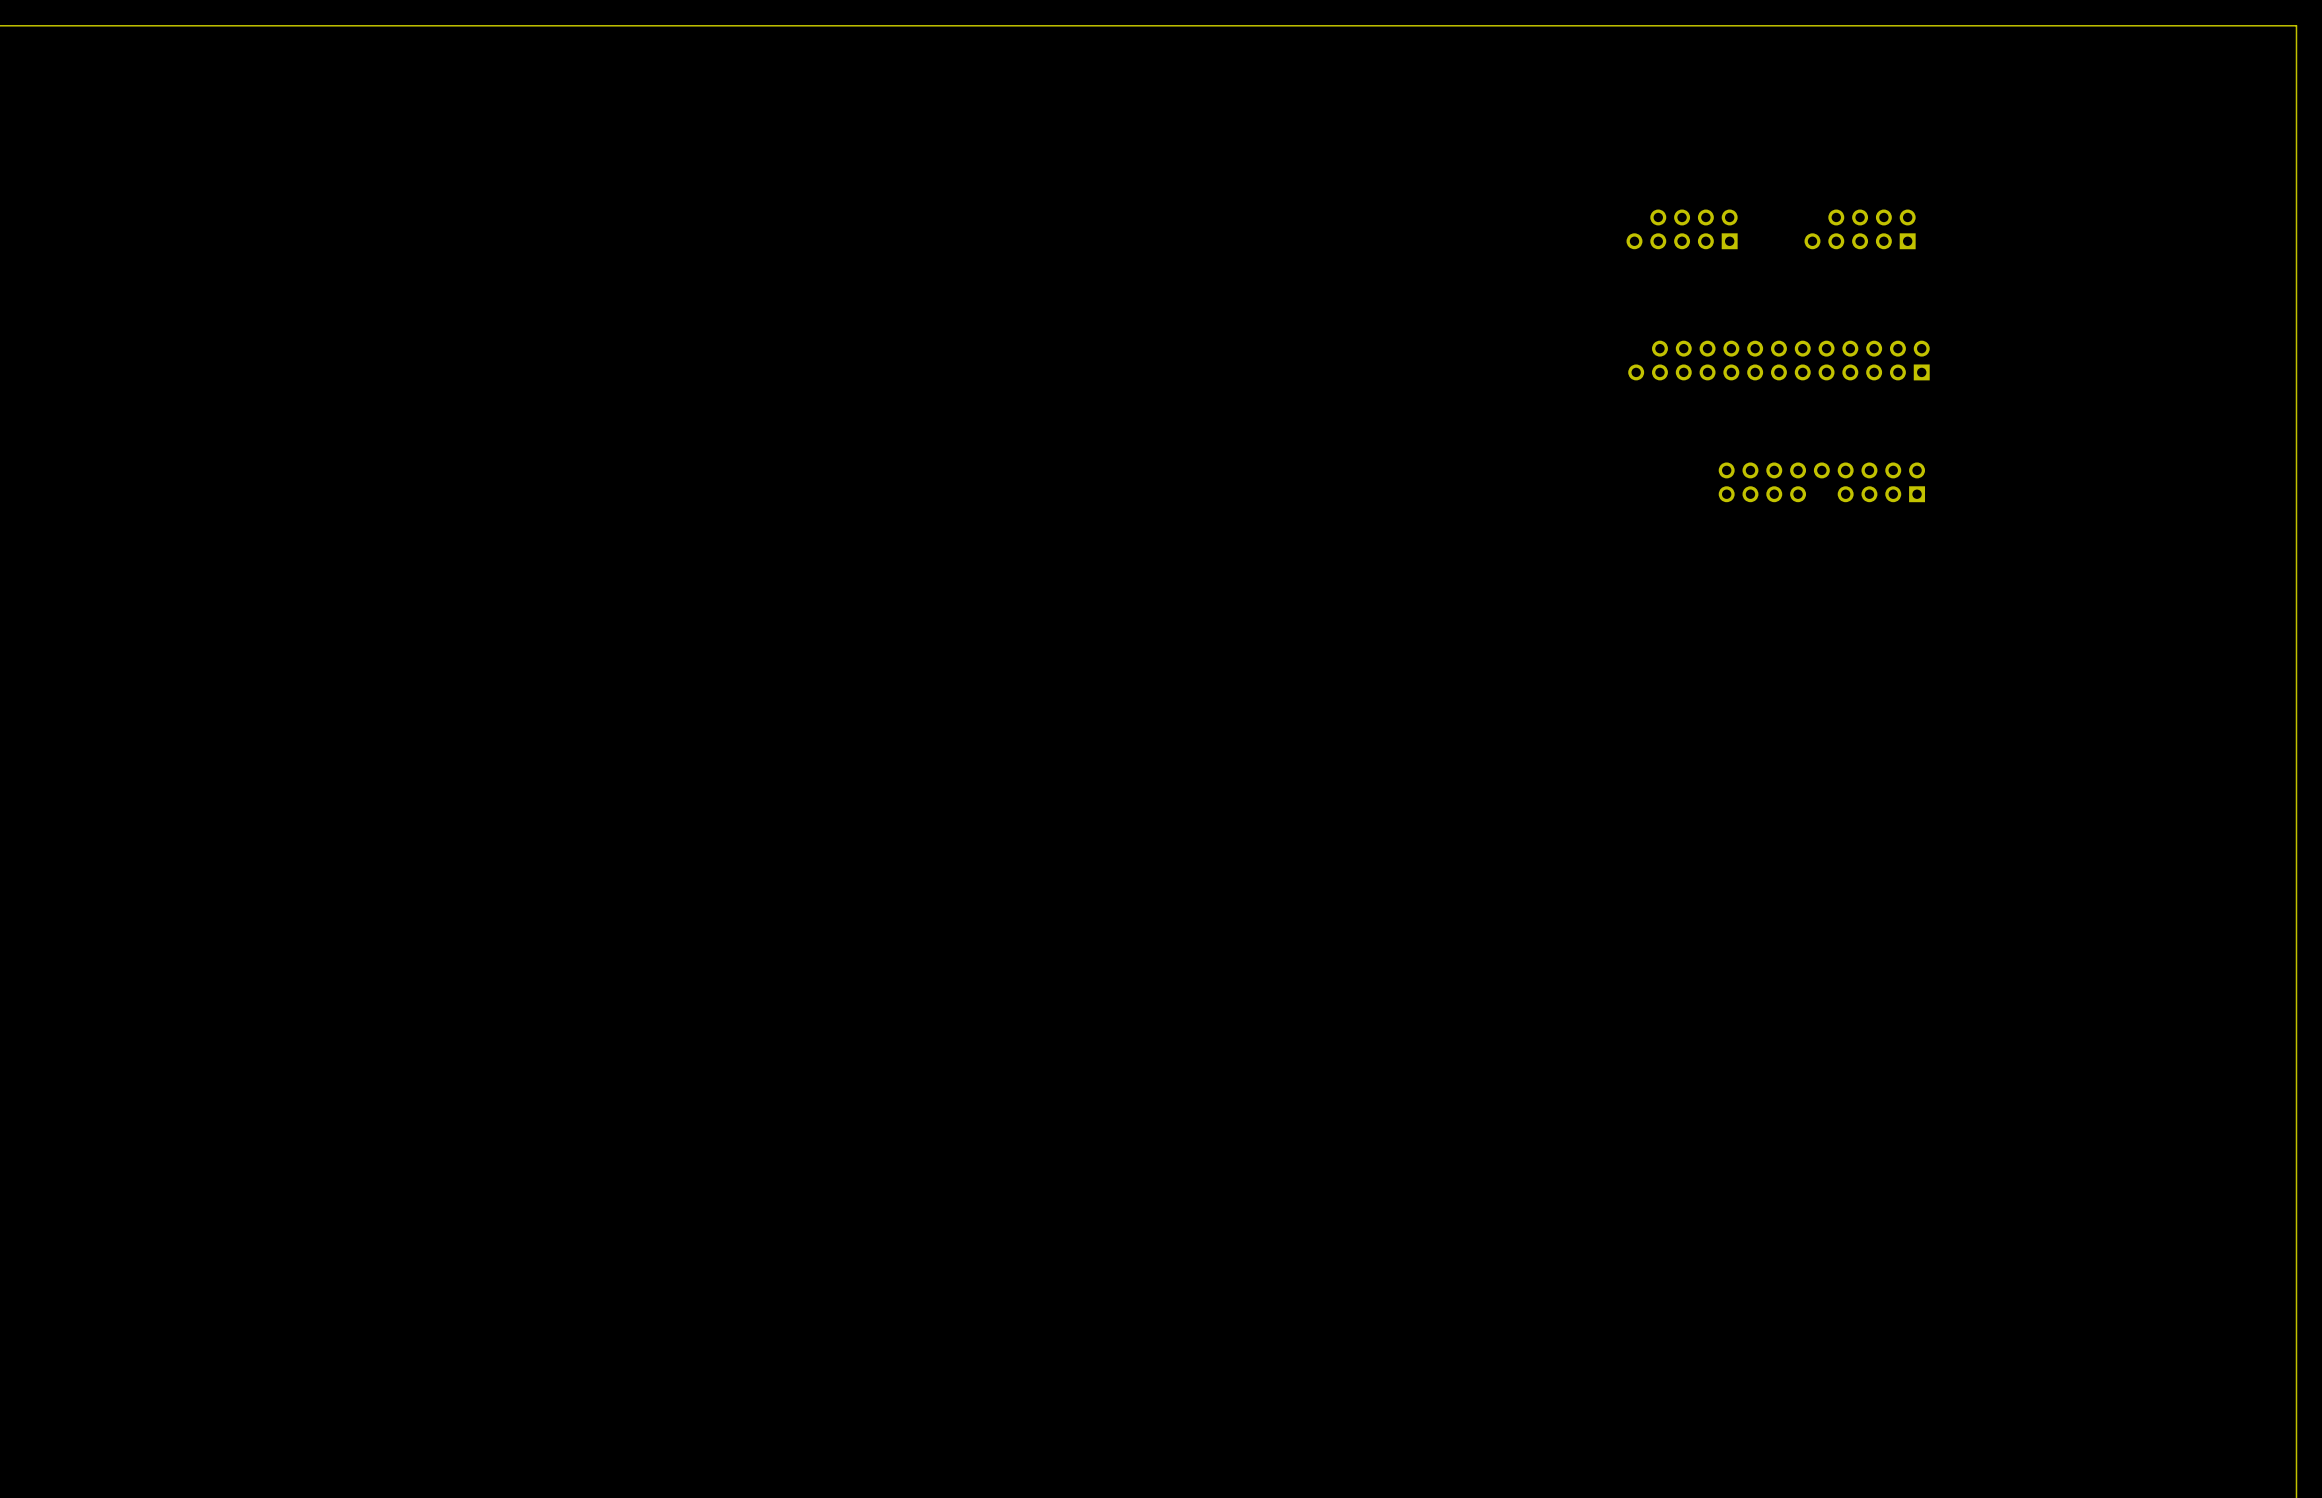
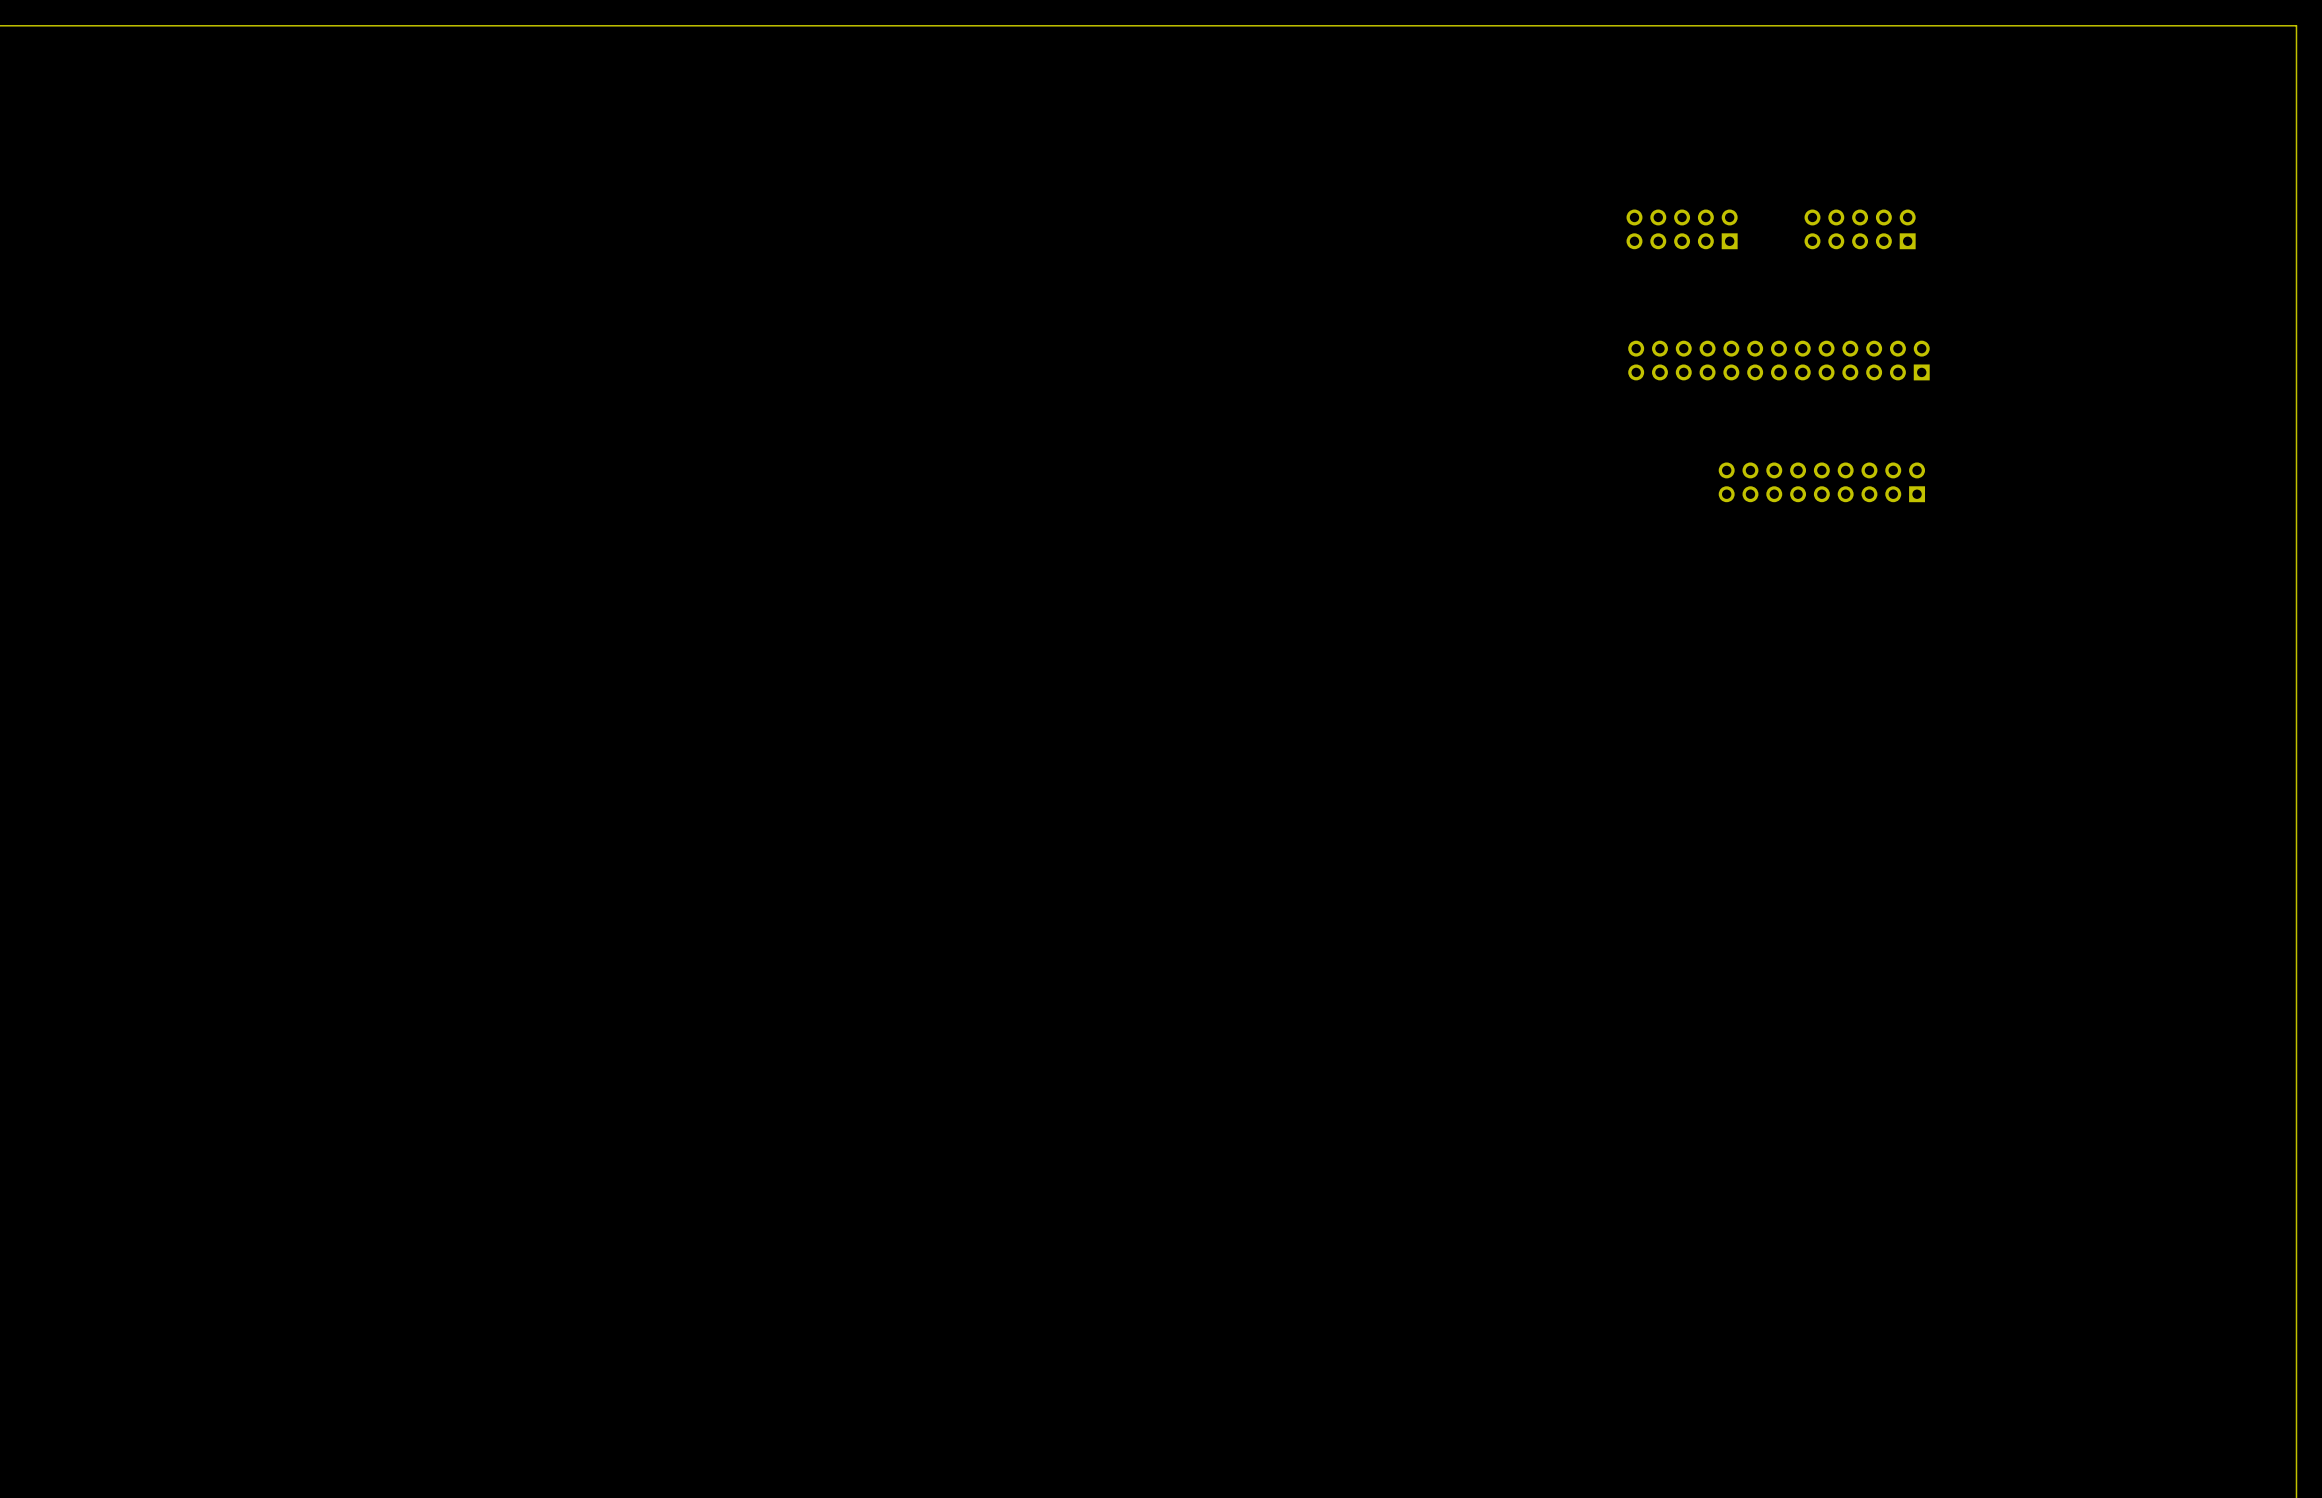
part footprint: [1626, 209, 1738, 250] -> [1626, 209, 1738, 250]
part footprint: [1804, 209, 1916, 250] -> [1804, 209, 1916, 250]
part footprint: [1628, 340, 1930, 381] -> [1628, 340, 1930, 381]
part footprint: [1718, 462, 1926, 503] -> [1718, 462, 1926, 503]

